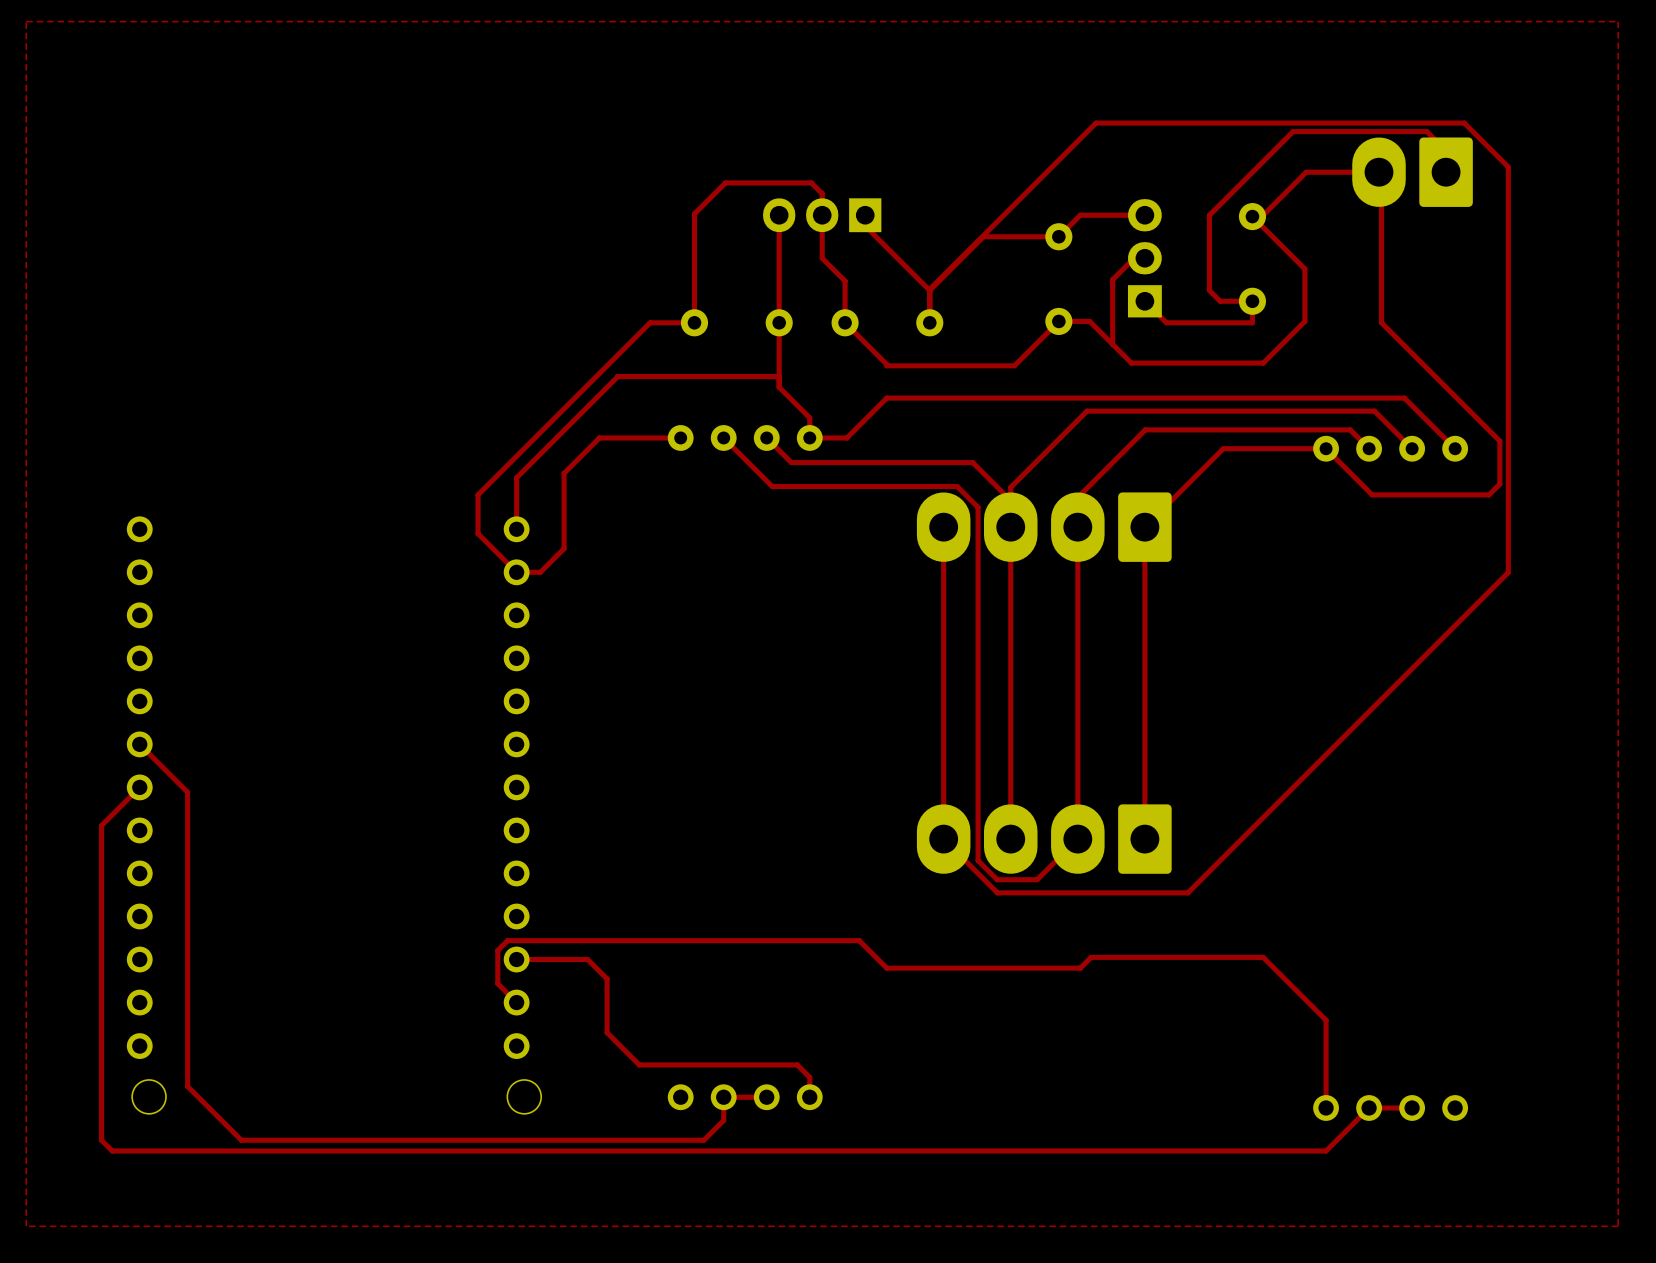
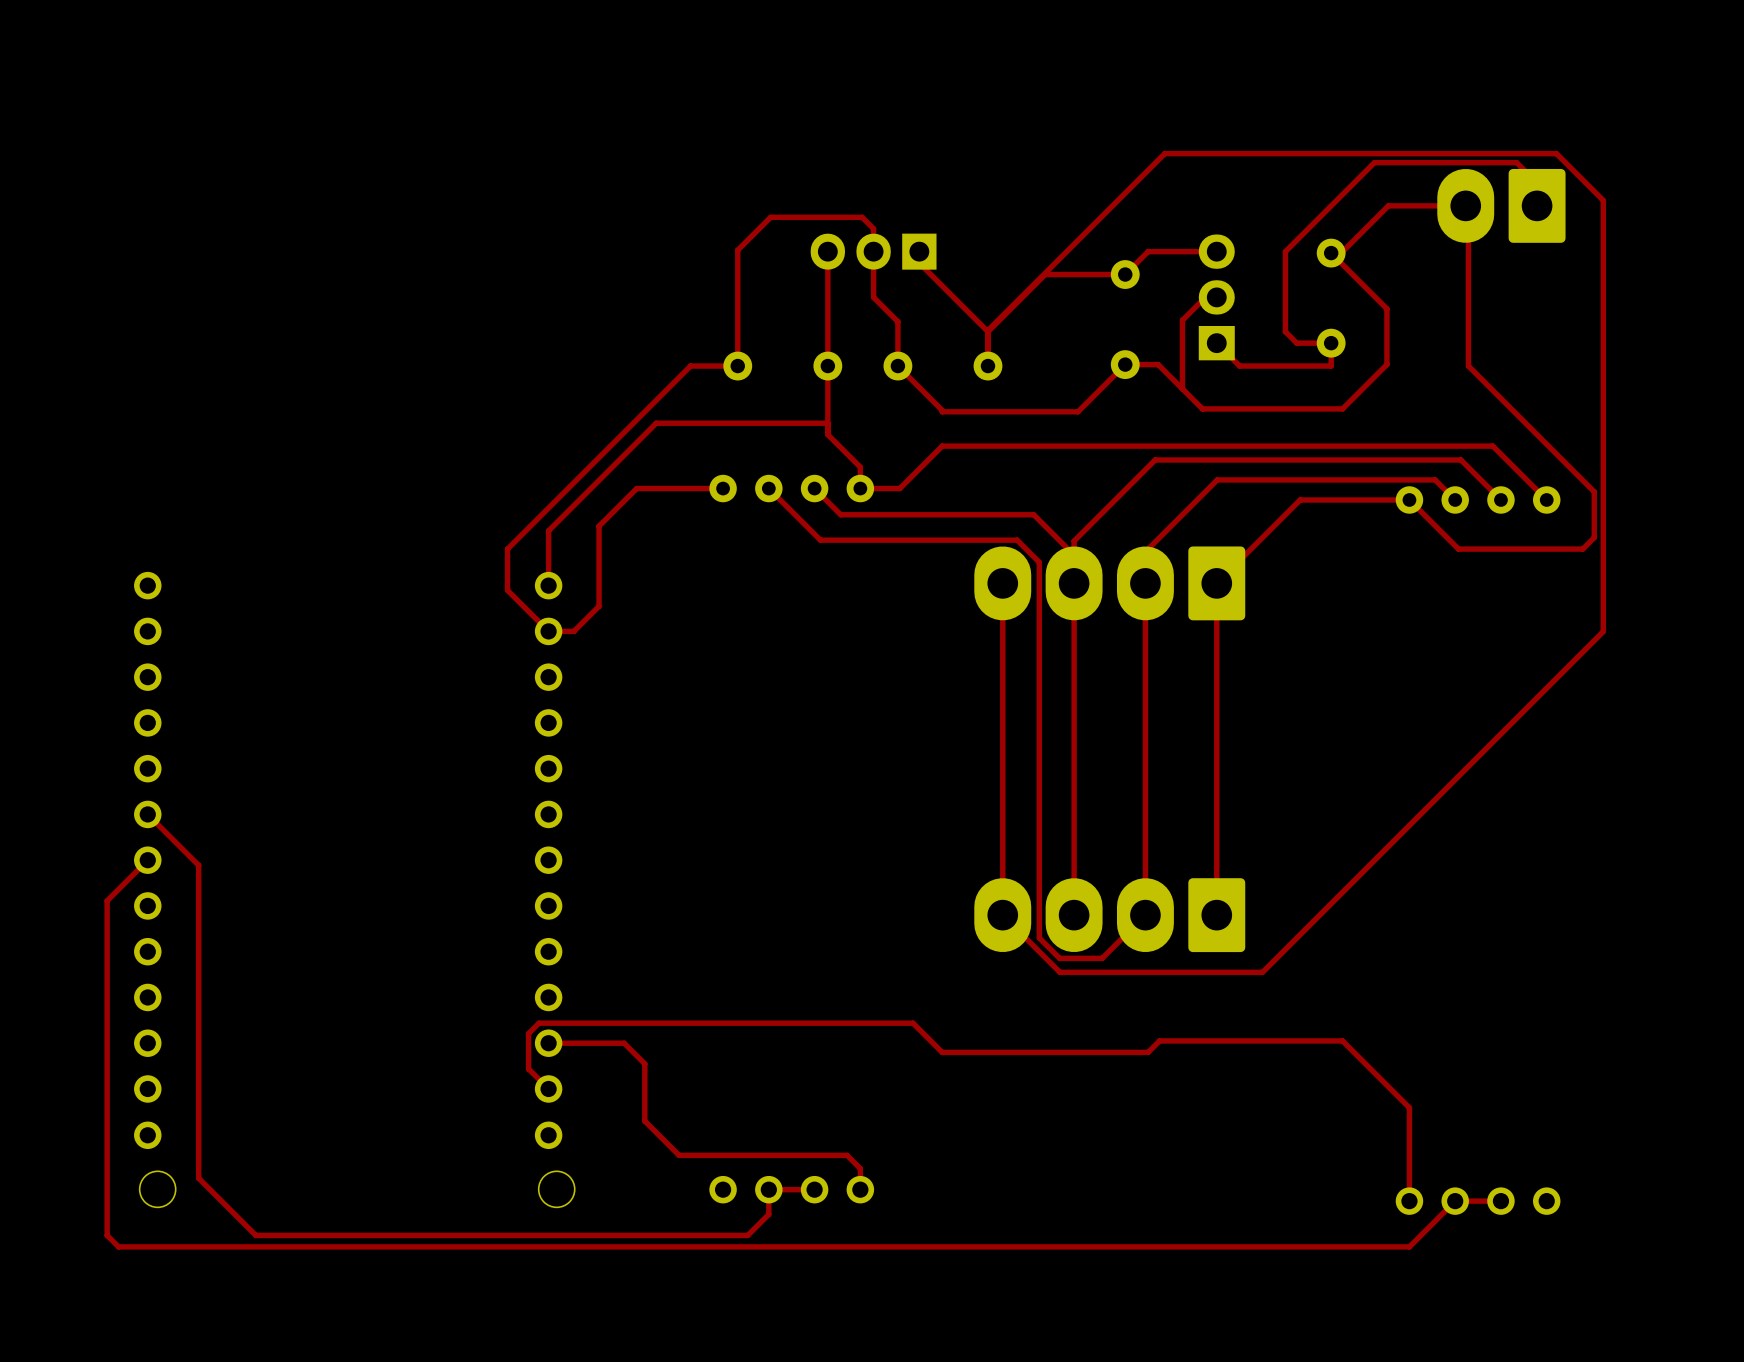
zone outline: (26, 21) (26, 1226) (1618, 1226) (1618, 21) (26, 21) -> none

